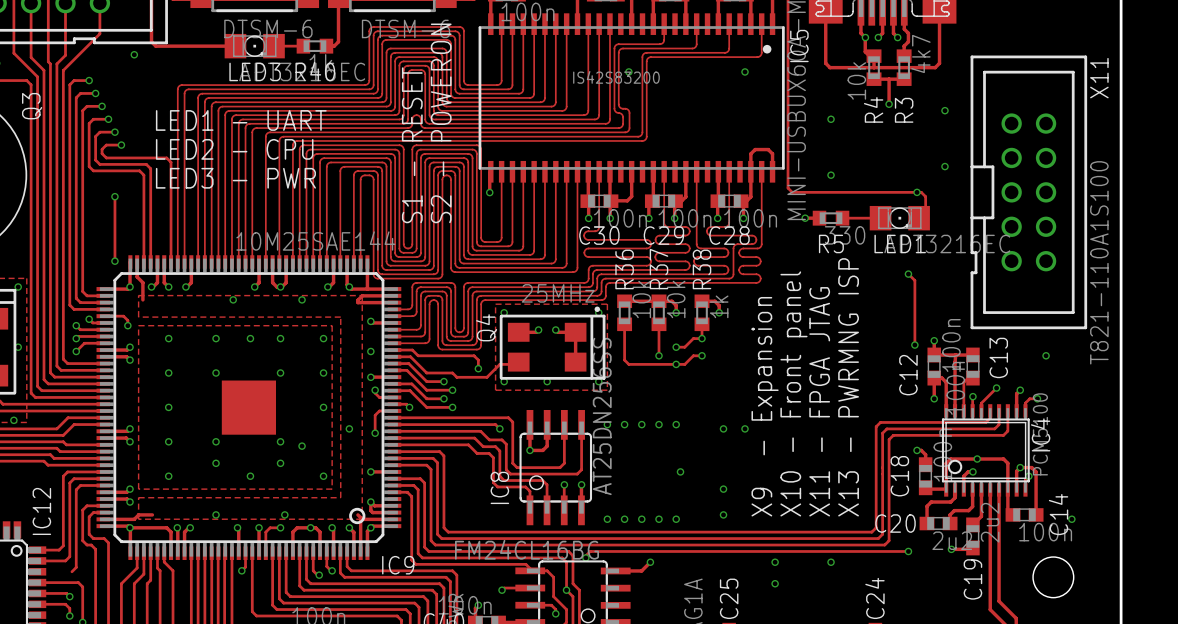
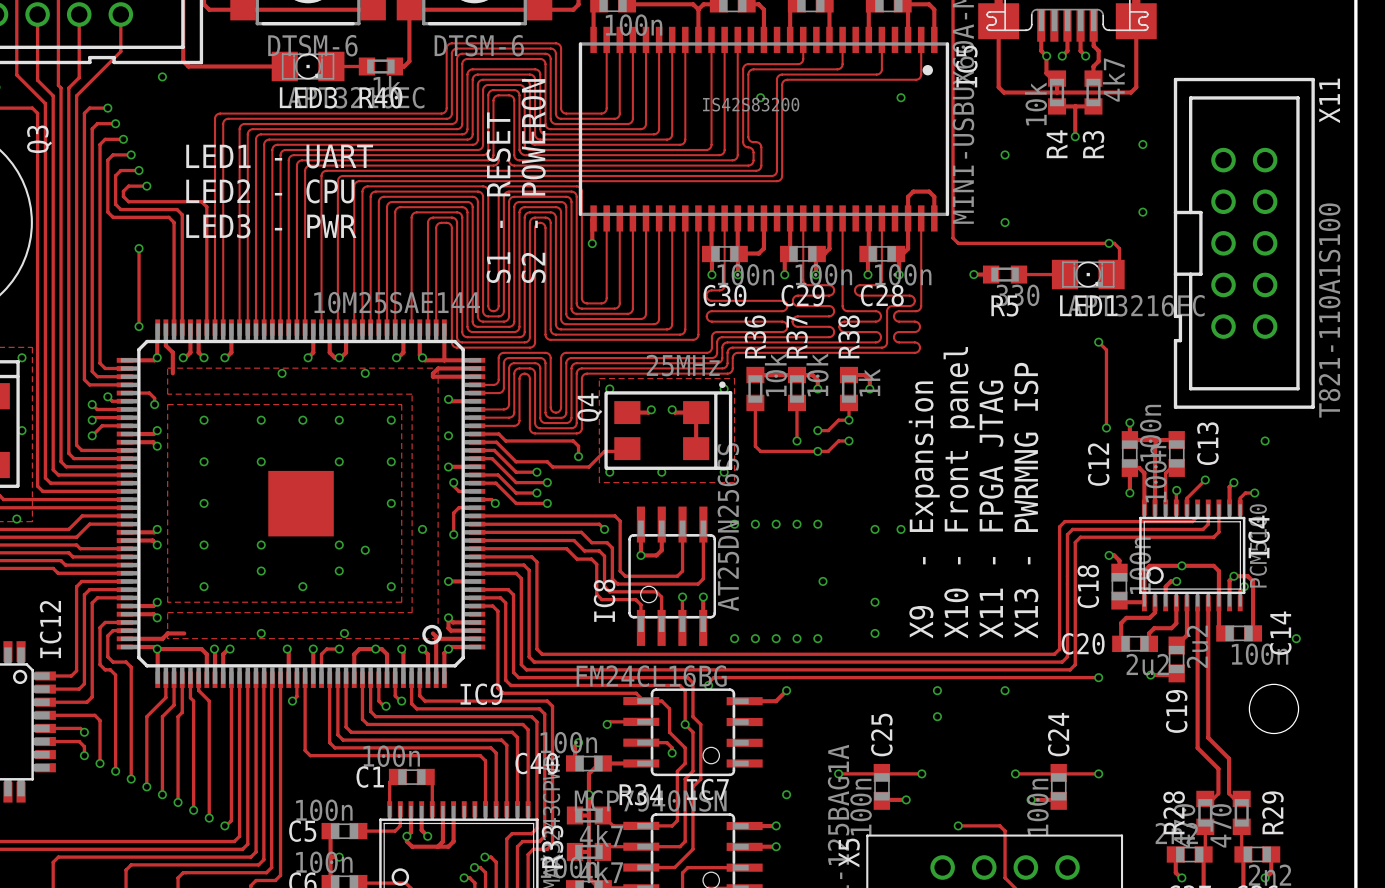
track: none -> (45, 702) (87, 702)

